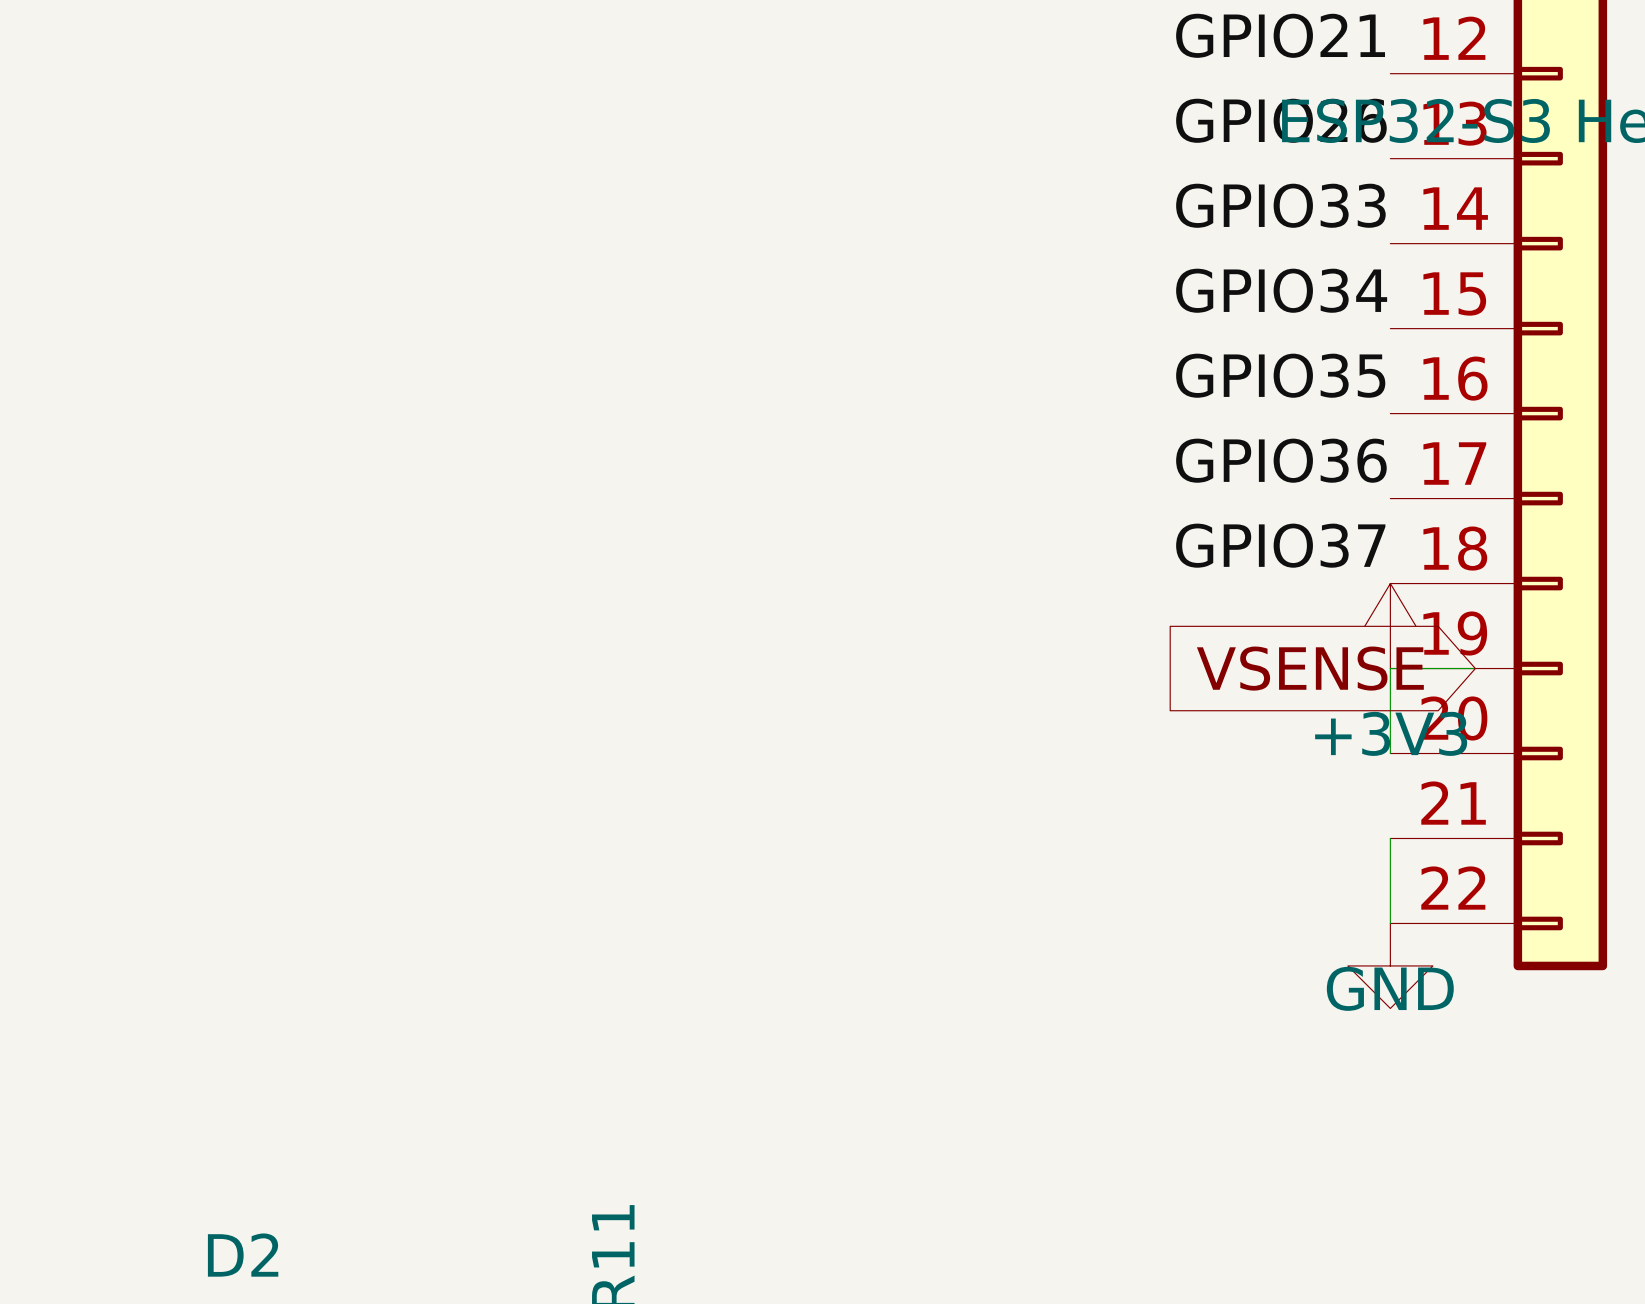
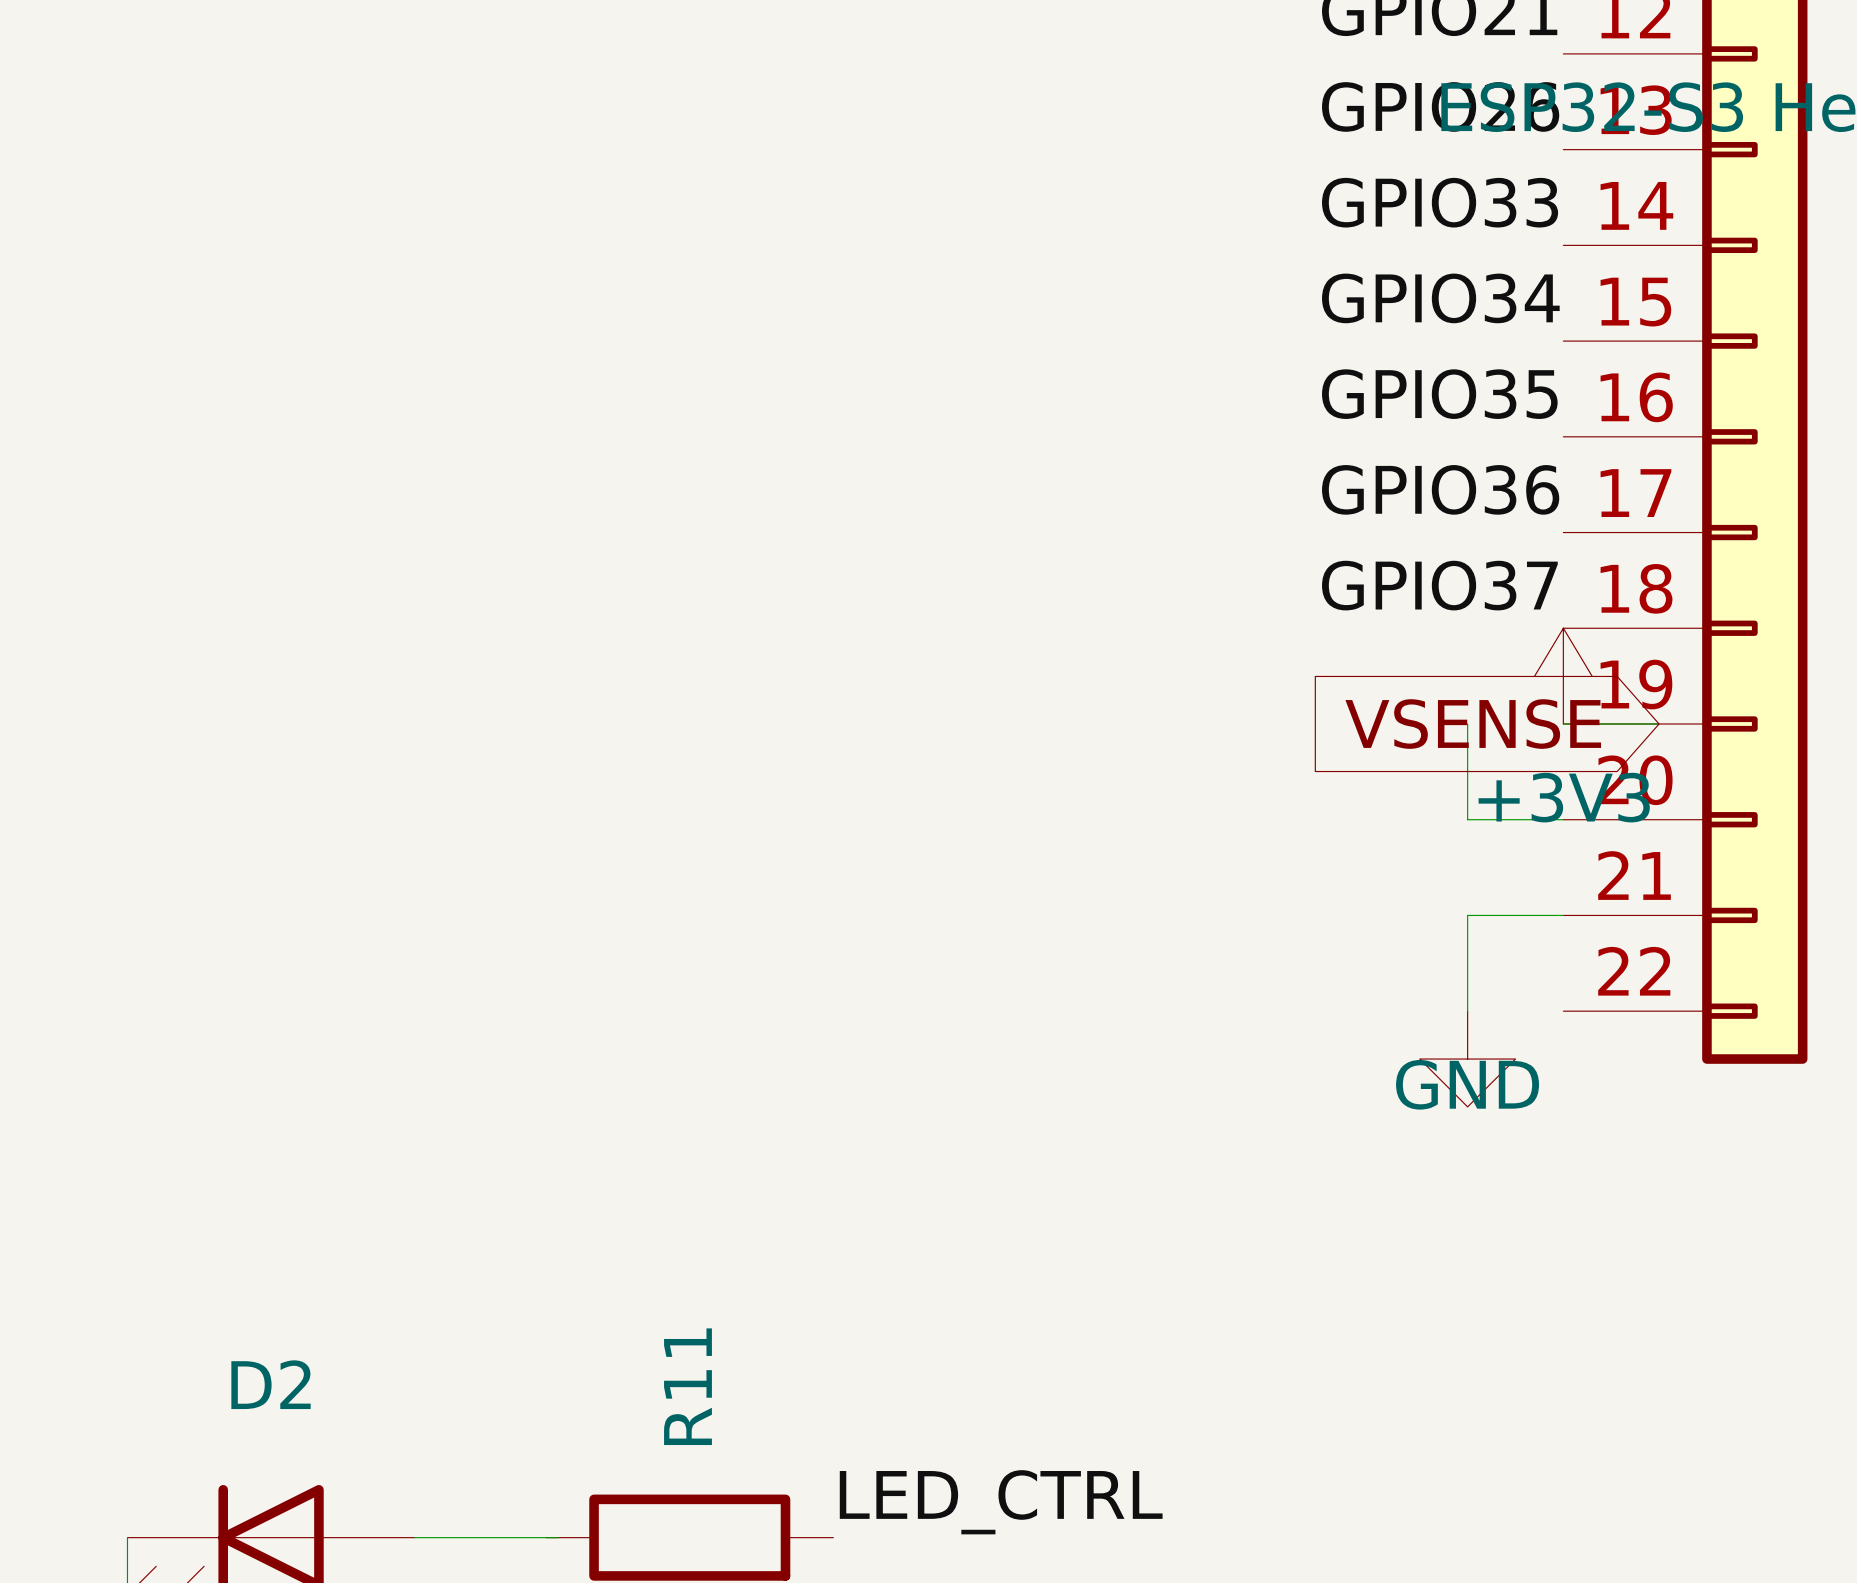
wire: (1390, 668) (1390, 753) -> (1467, 723) (1467, 819) (1563, 819)
wire: (1390, 838) (1390, 923) -> (1563, 915) (1467, 915) (1467, 1011)
power symbol position: GND (1390, 965) -> GND (1467, 1059)

